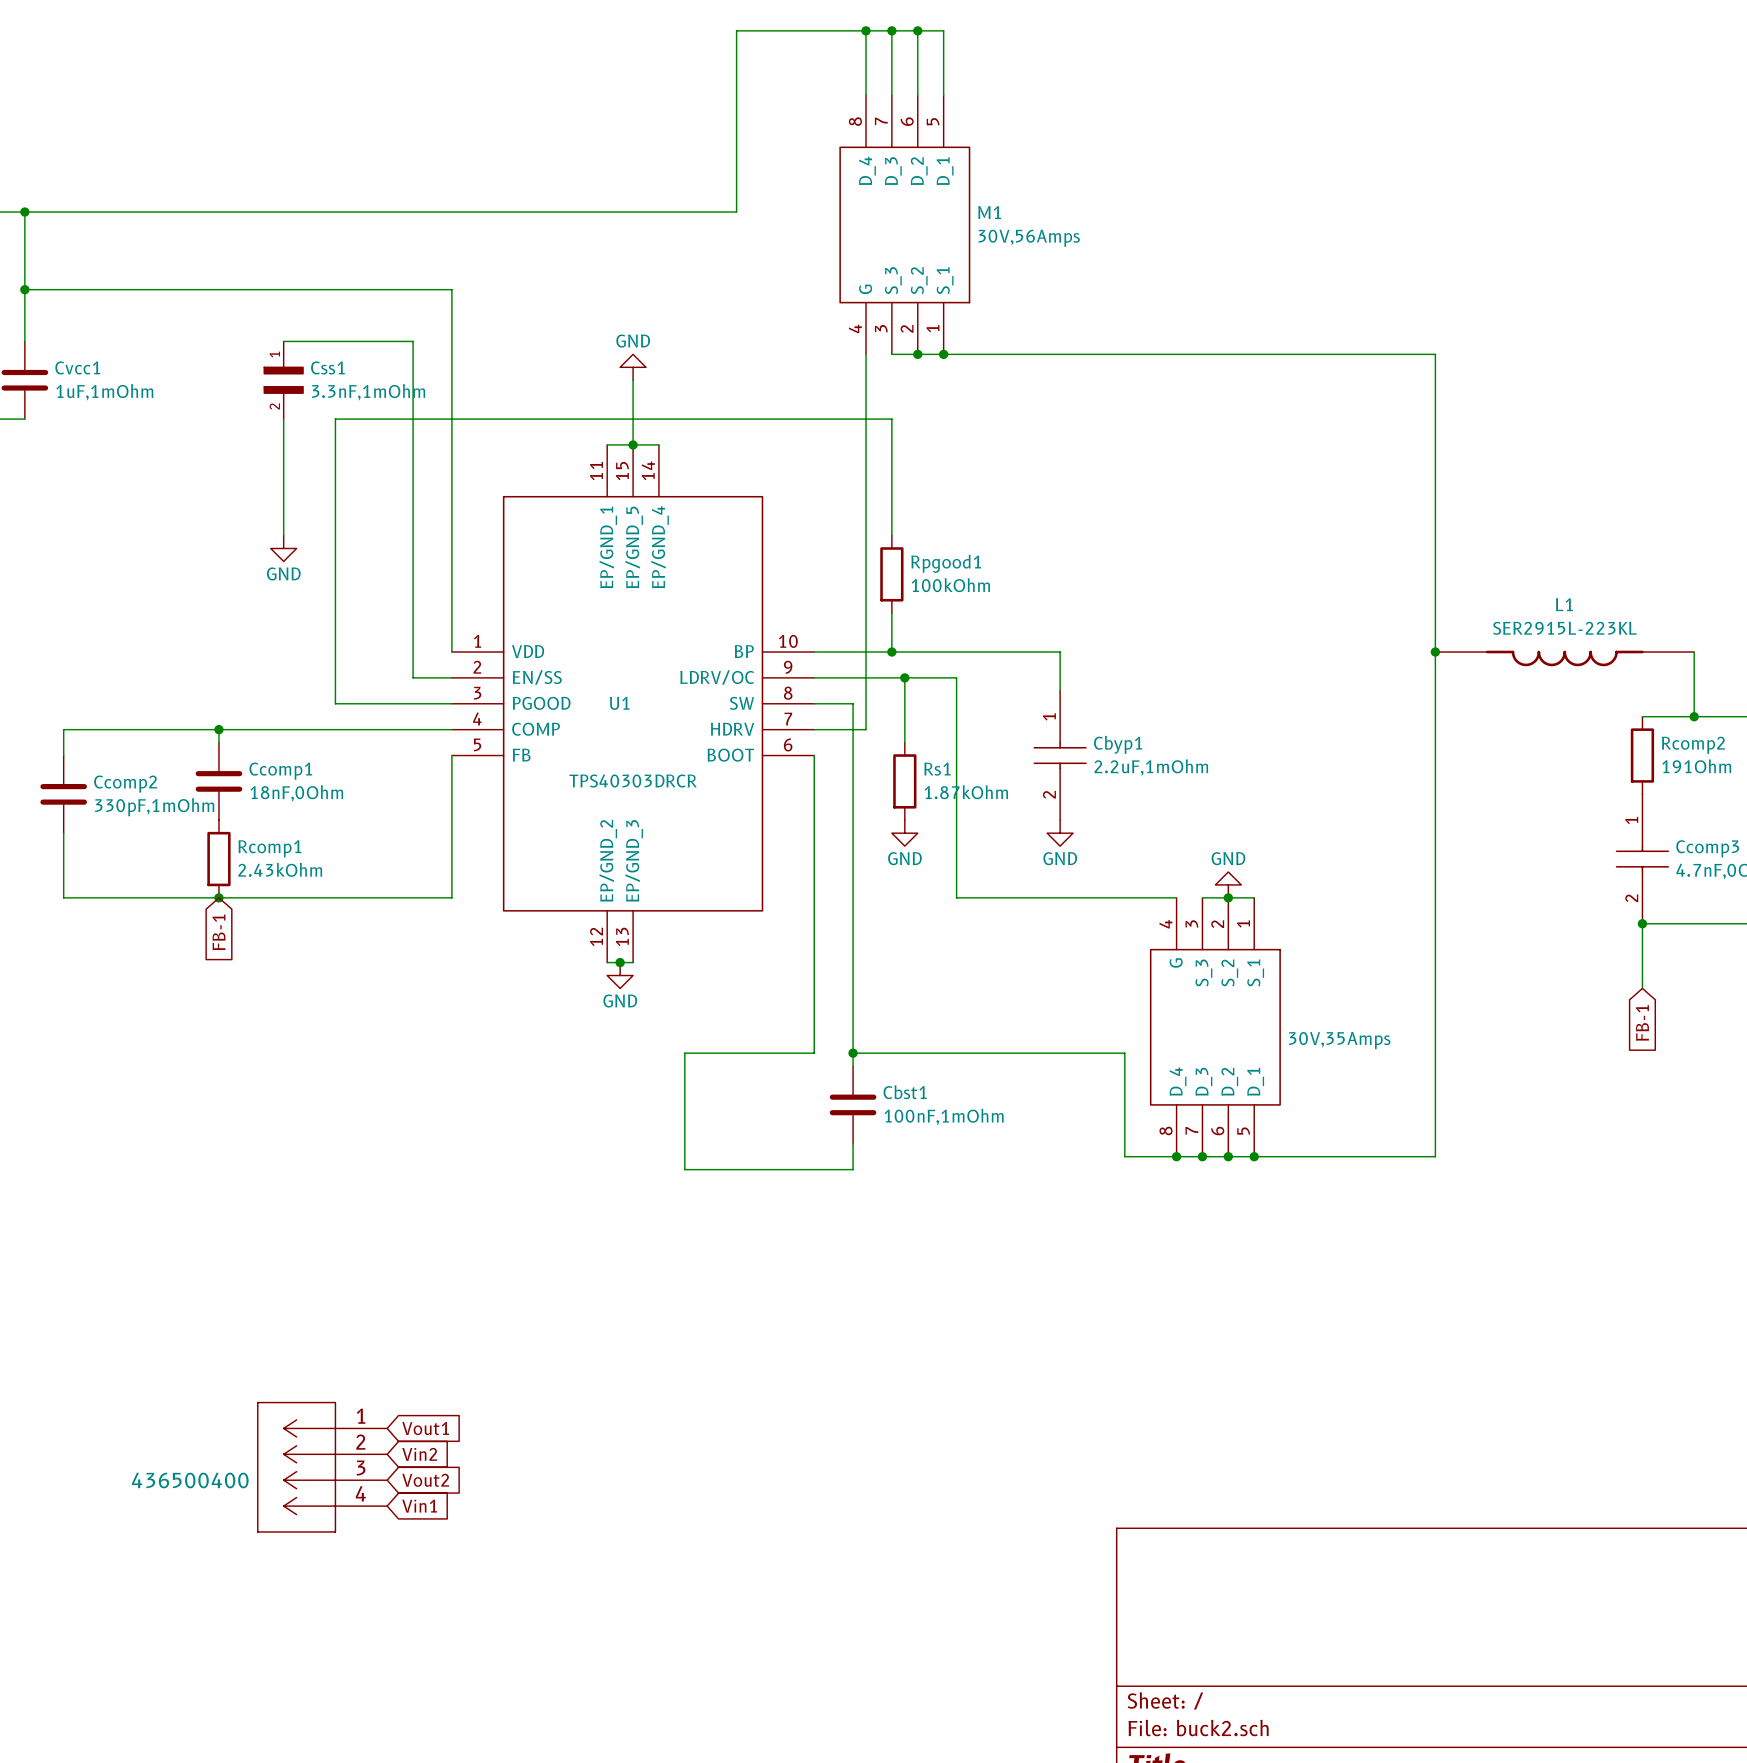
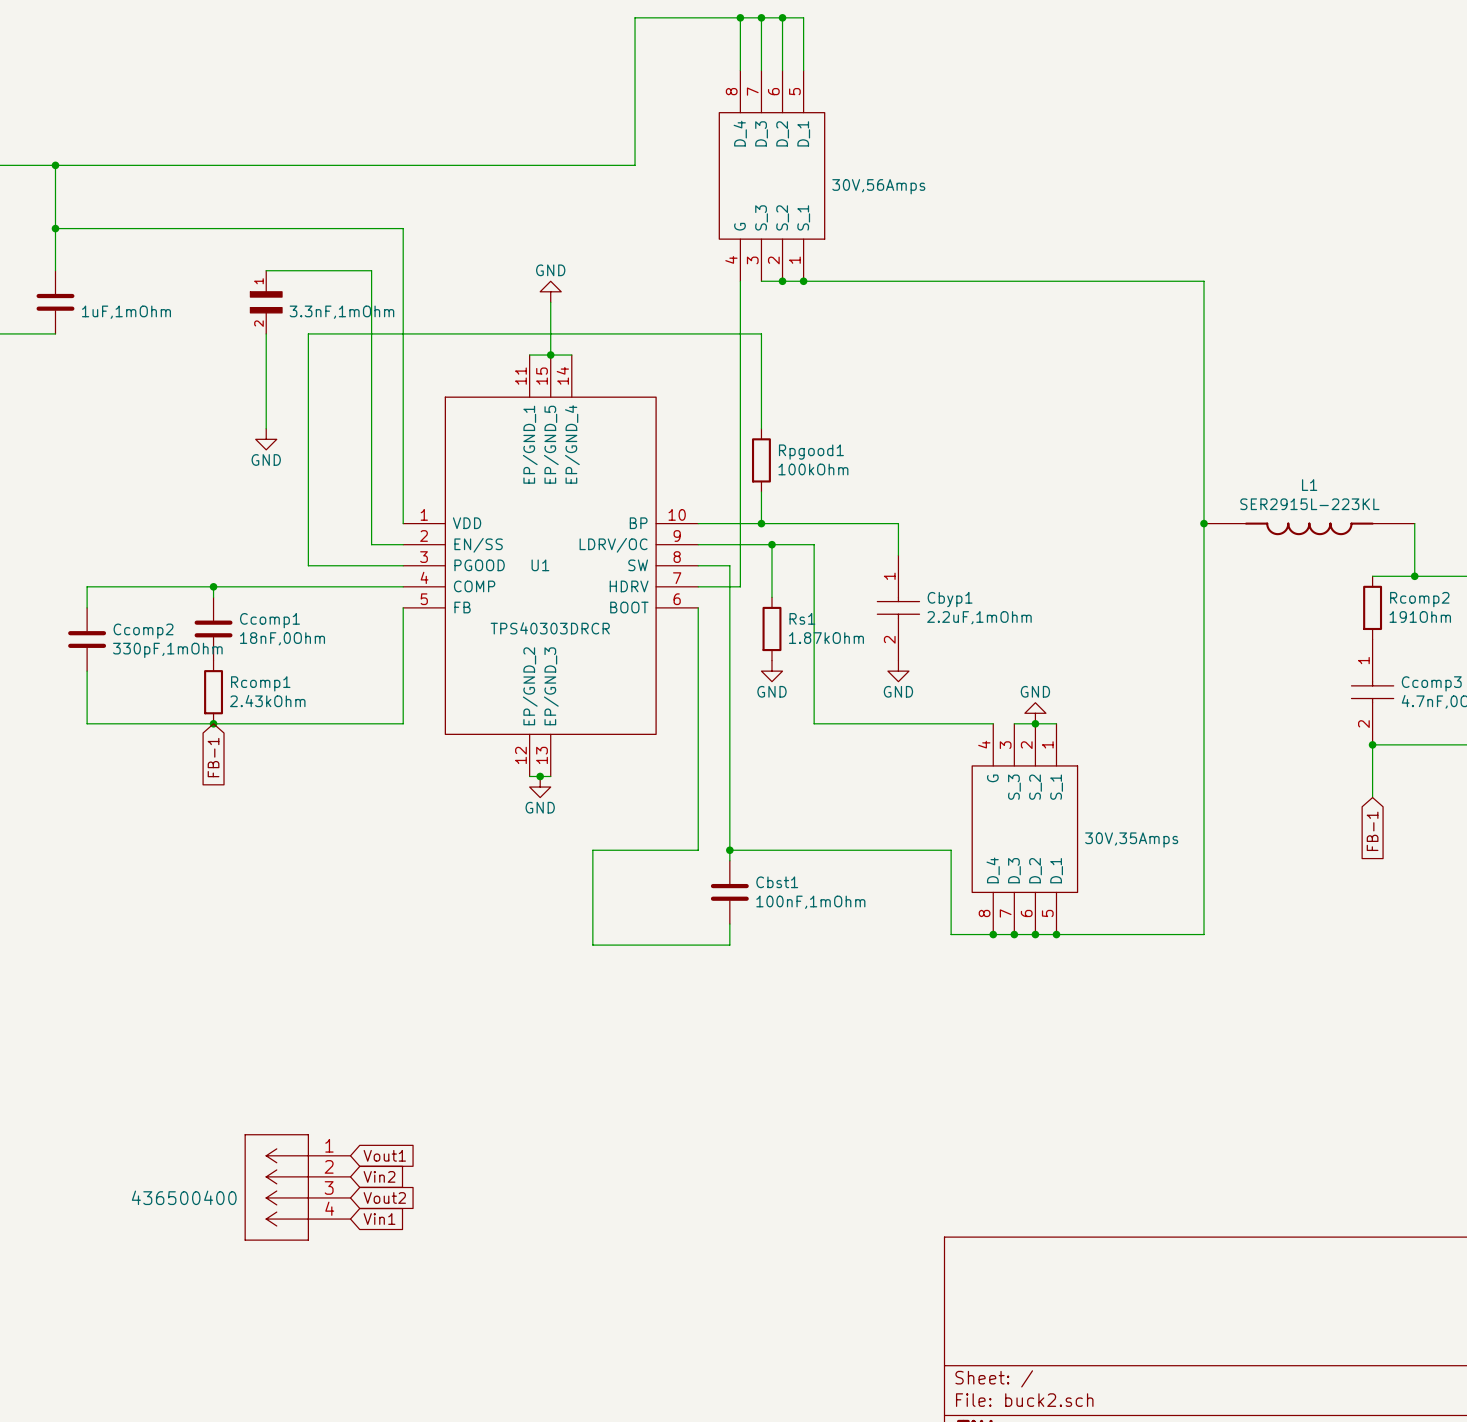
M1 name: M1 (989, 212) -> none
Cvcc1 name: Cvcc1 (77, 367) -> none
Css1 name: Css1 (327, 367) -> none

